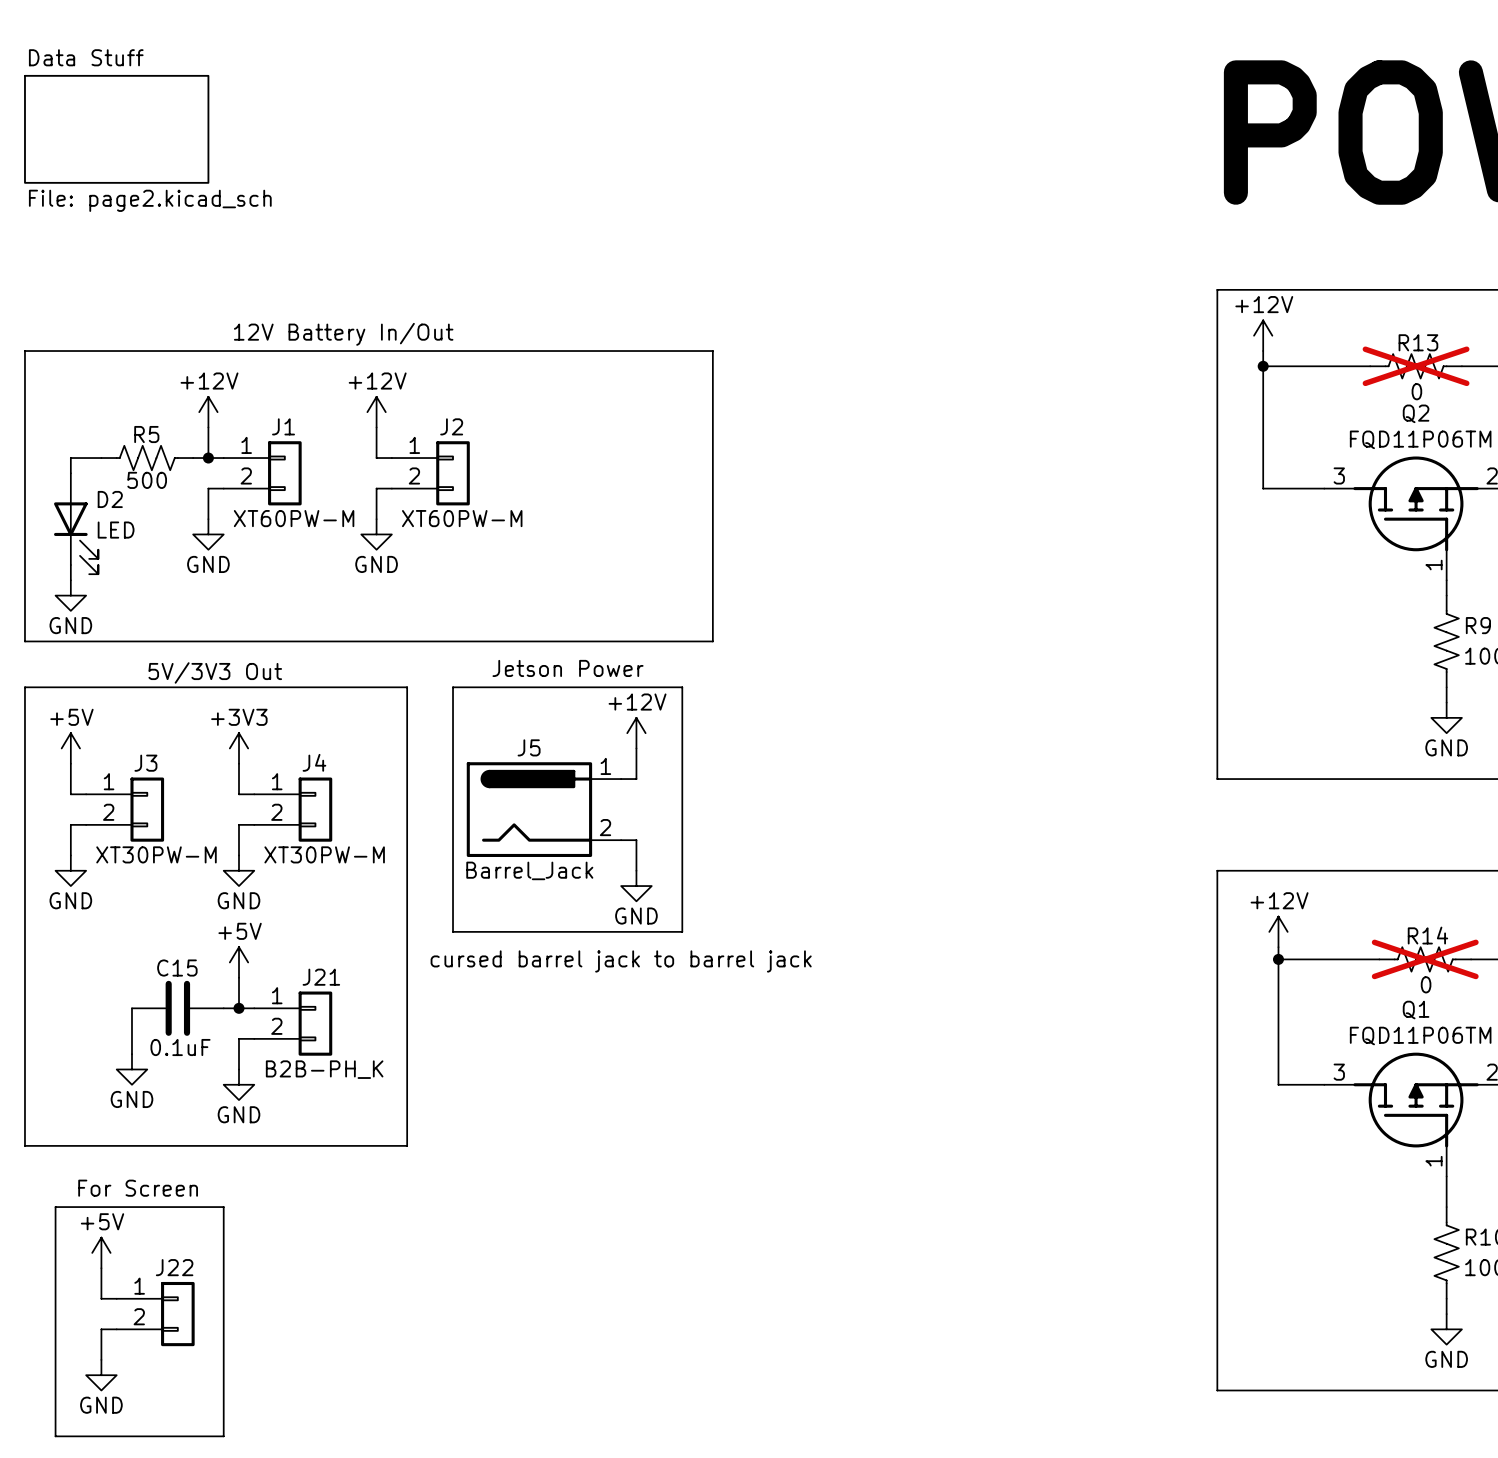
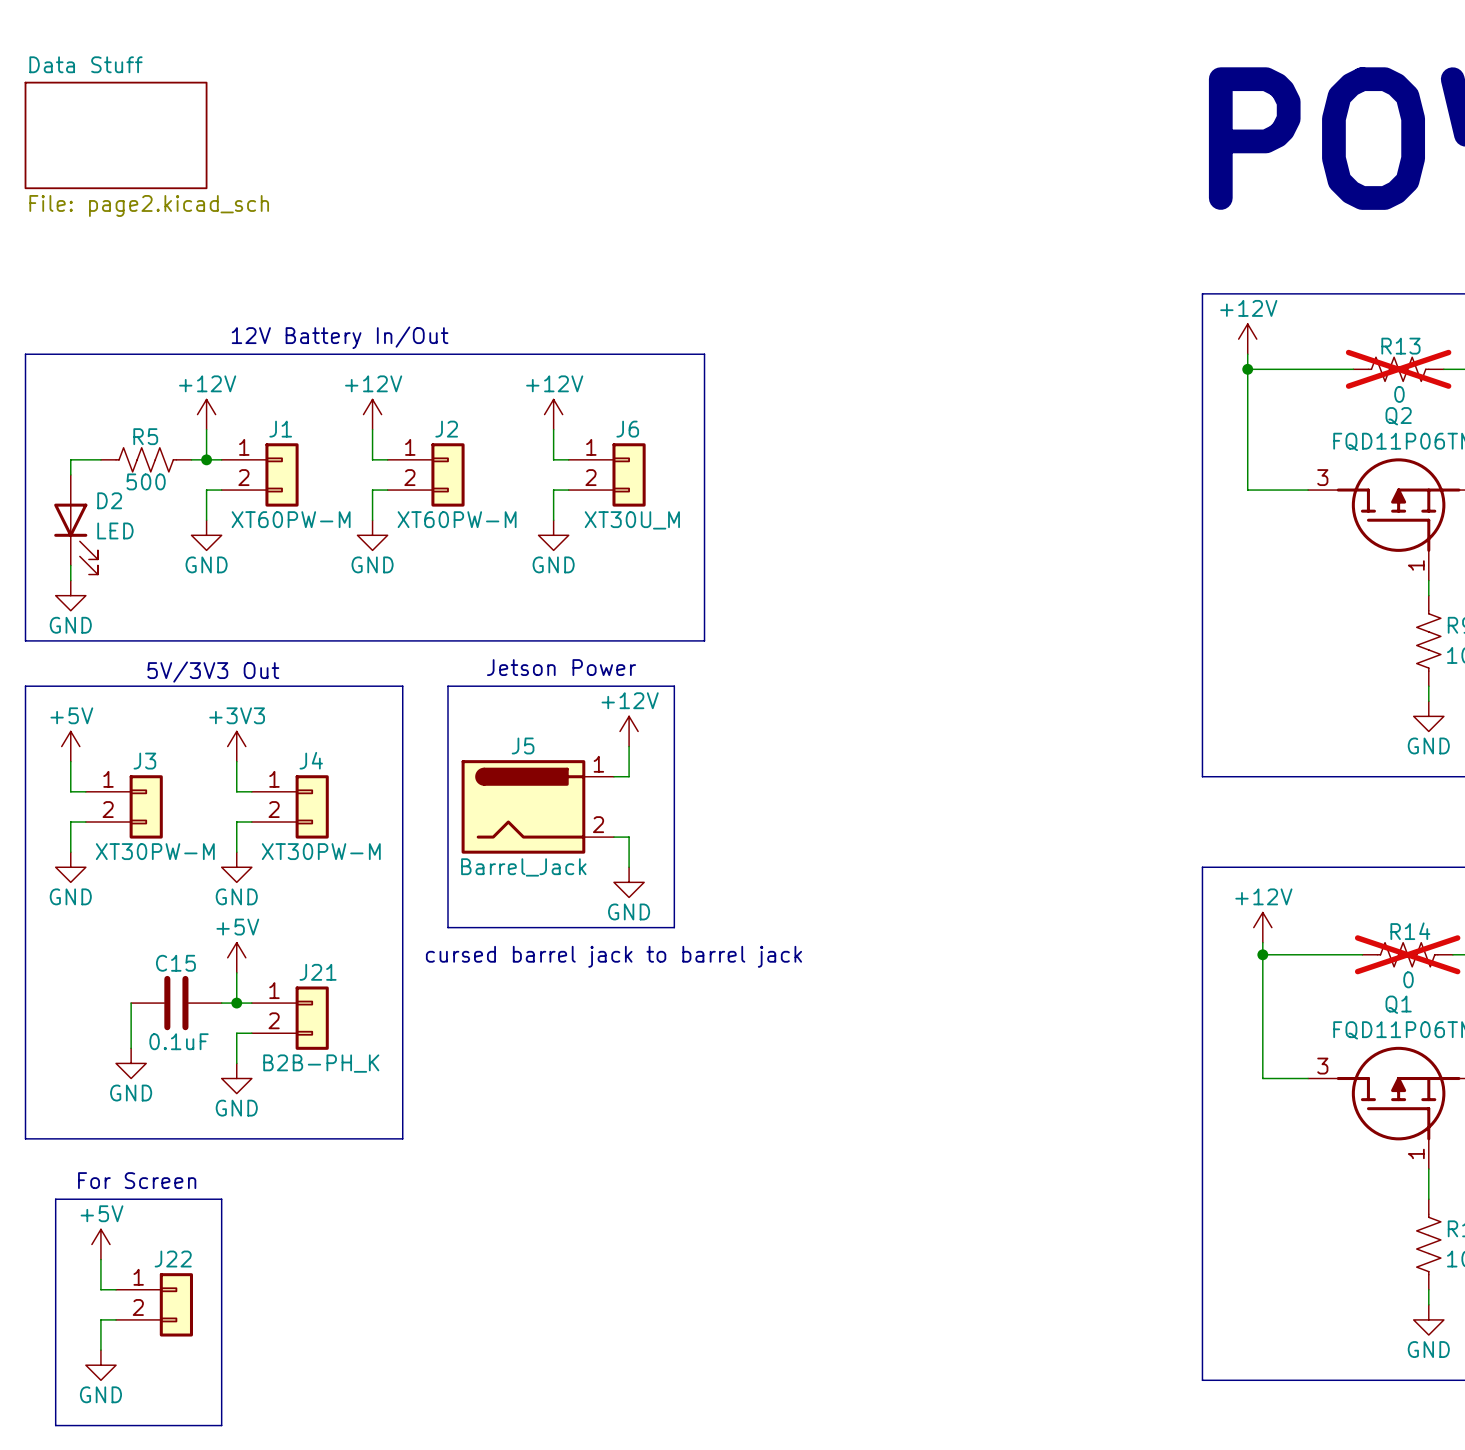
power symbol: none -> +12V (553, 414)
wire: none -> (553, 429) (553, 459) (568, 459)
J6: none -> XT30U_M (607, 474)
wire: none -> (568, 490) (553, 490) (553, 520)
power symbol: none -> GND (553, 535)

